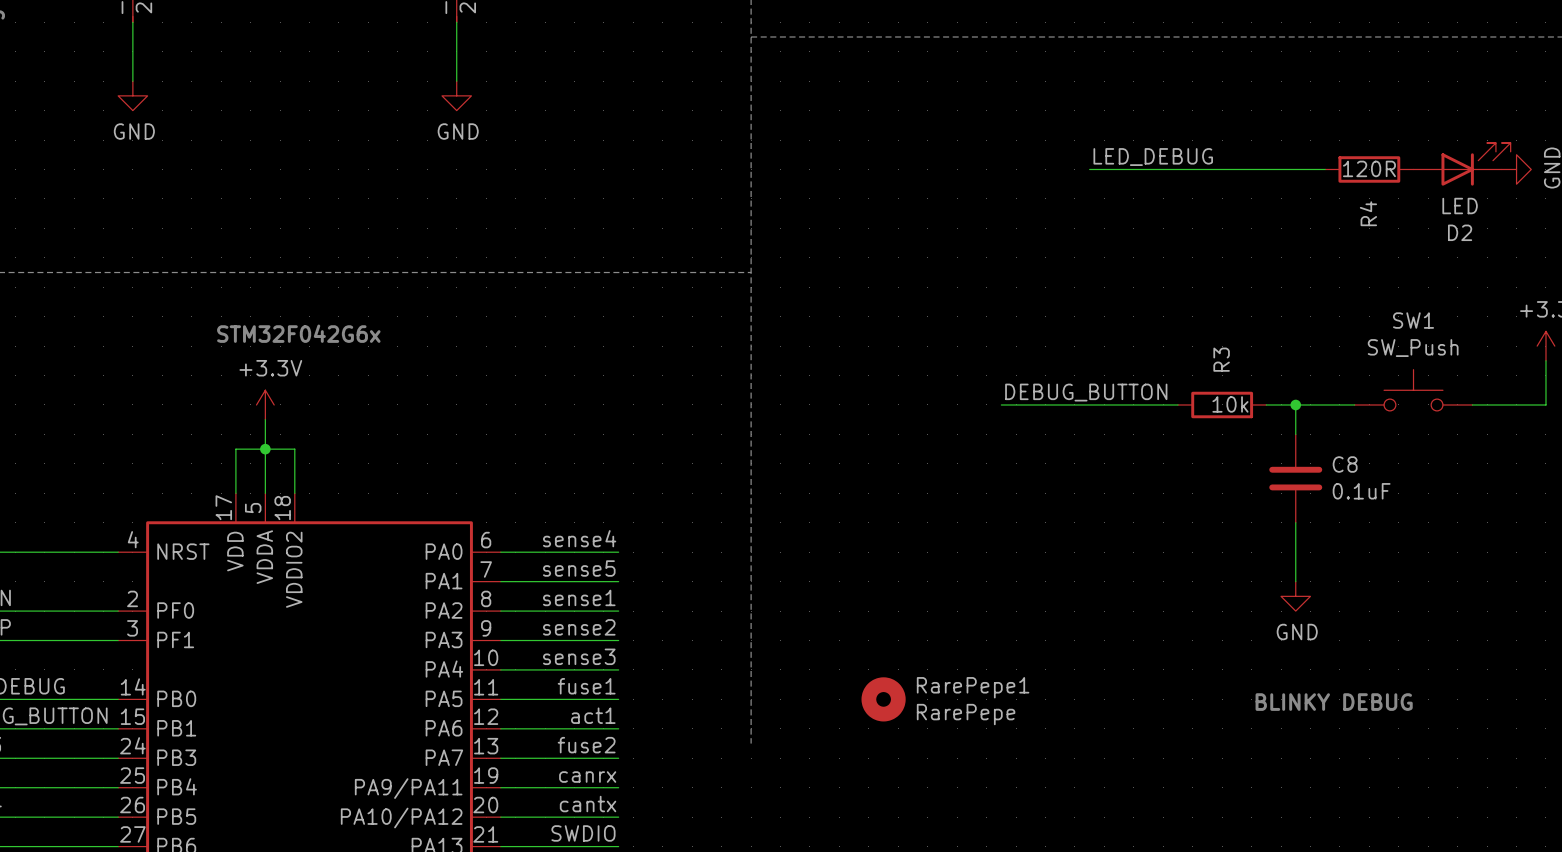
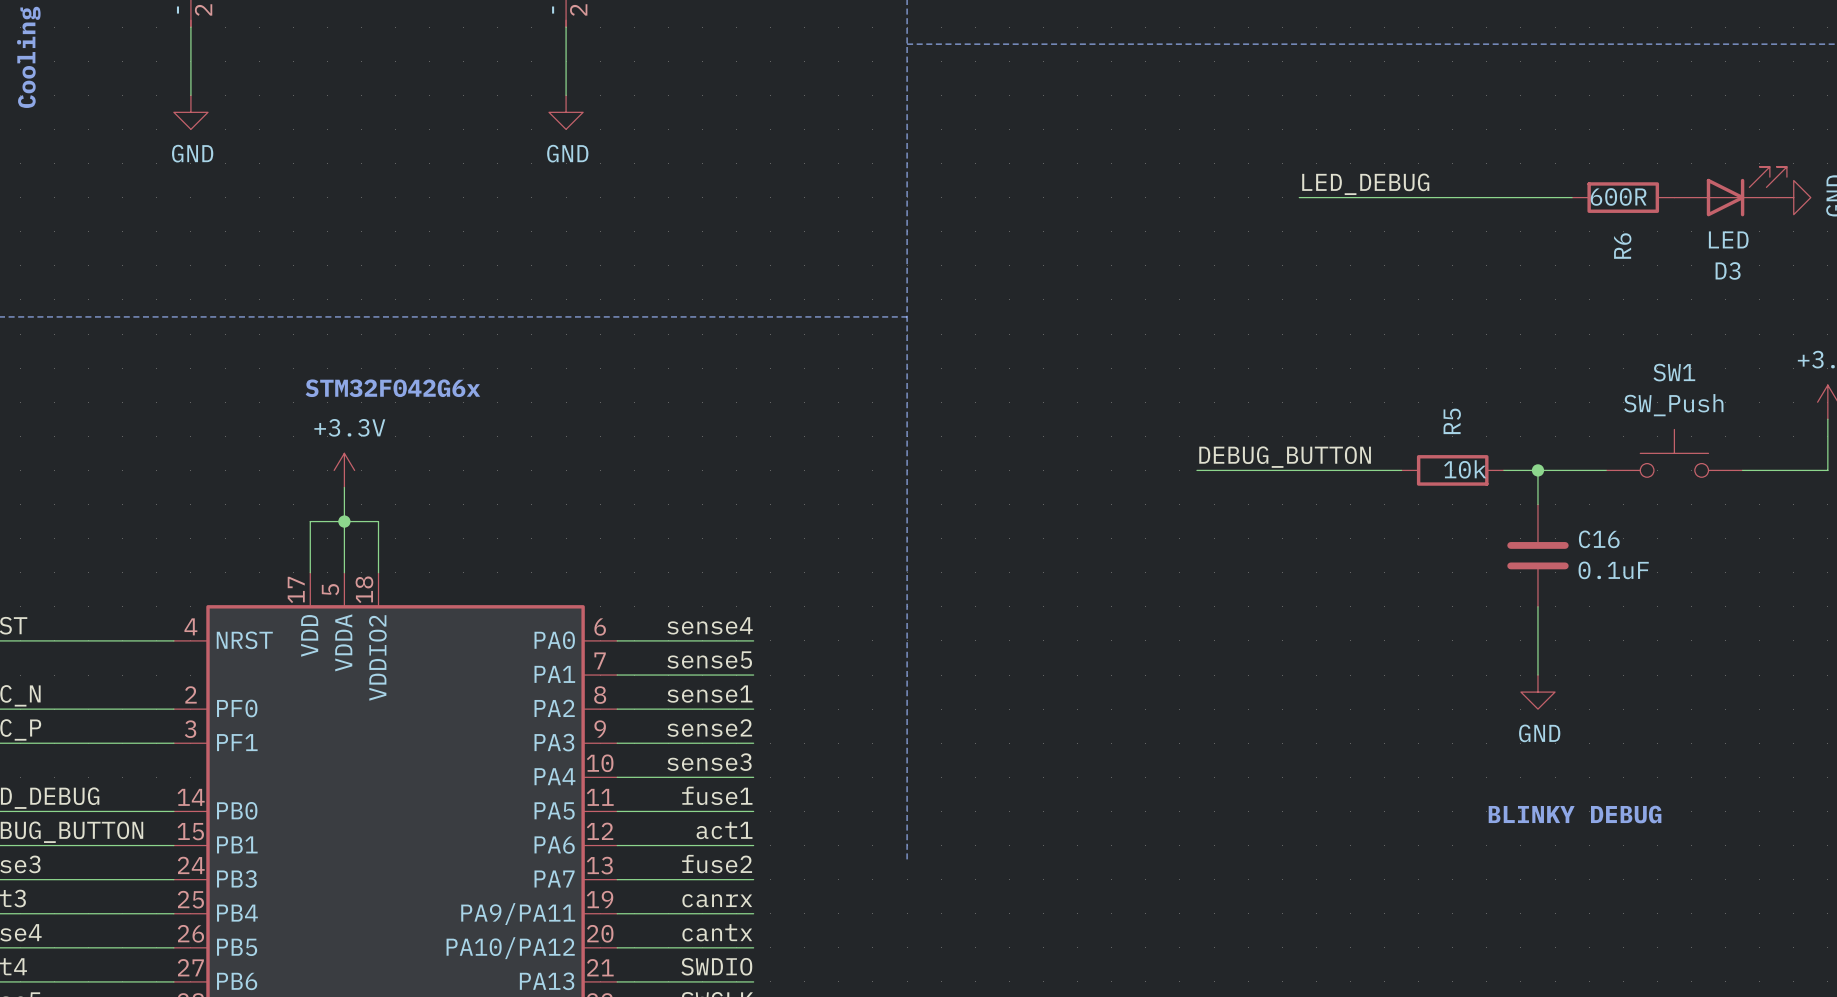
R4 value: 120R (1369, 168) -> 600R (1618, 196)
R4 name: R4 (1368, 213) -> R6 (1622, 246)
D2 name: D2 (1460, 232) -> D3 (1728, 270)
R3 name: R3 (1221, 359) -> R5 (1452, 421)
C8 name: C8 (1345, 464) -> C16 (1599, 539)
RarePepe1: RarePepe (883, 699) -> none

